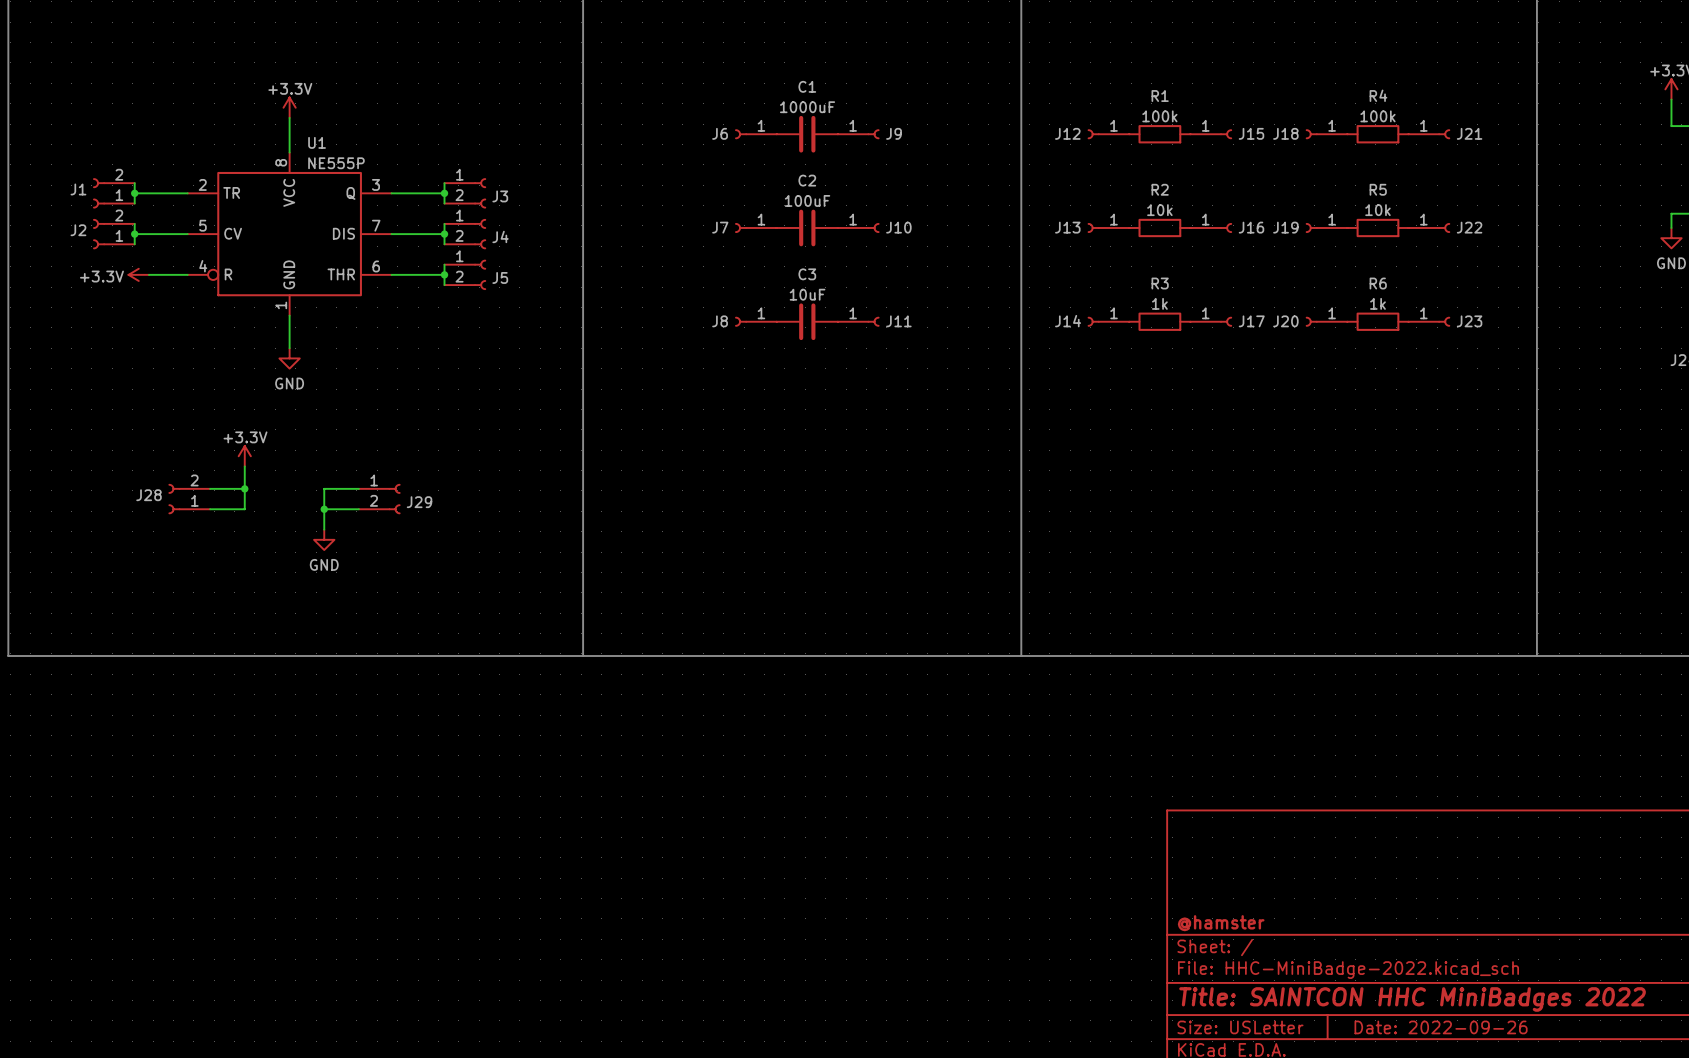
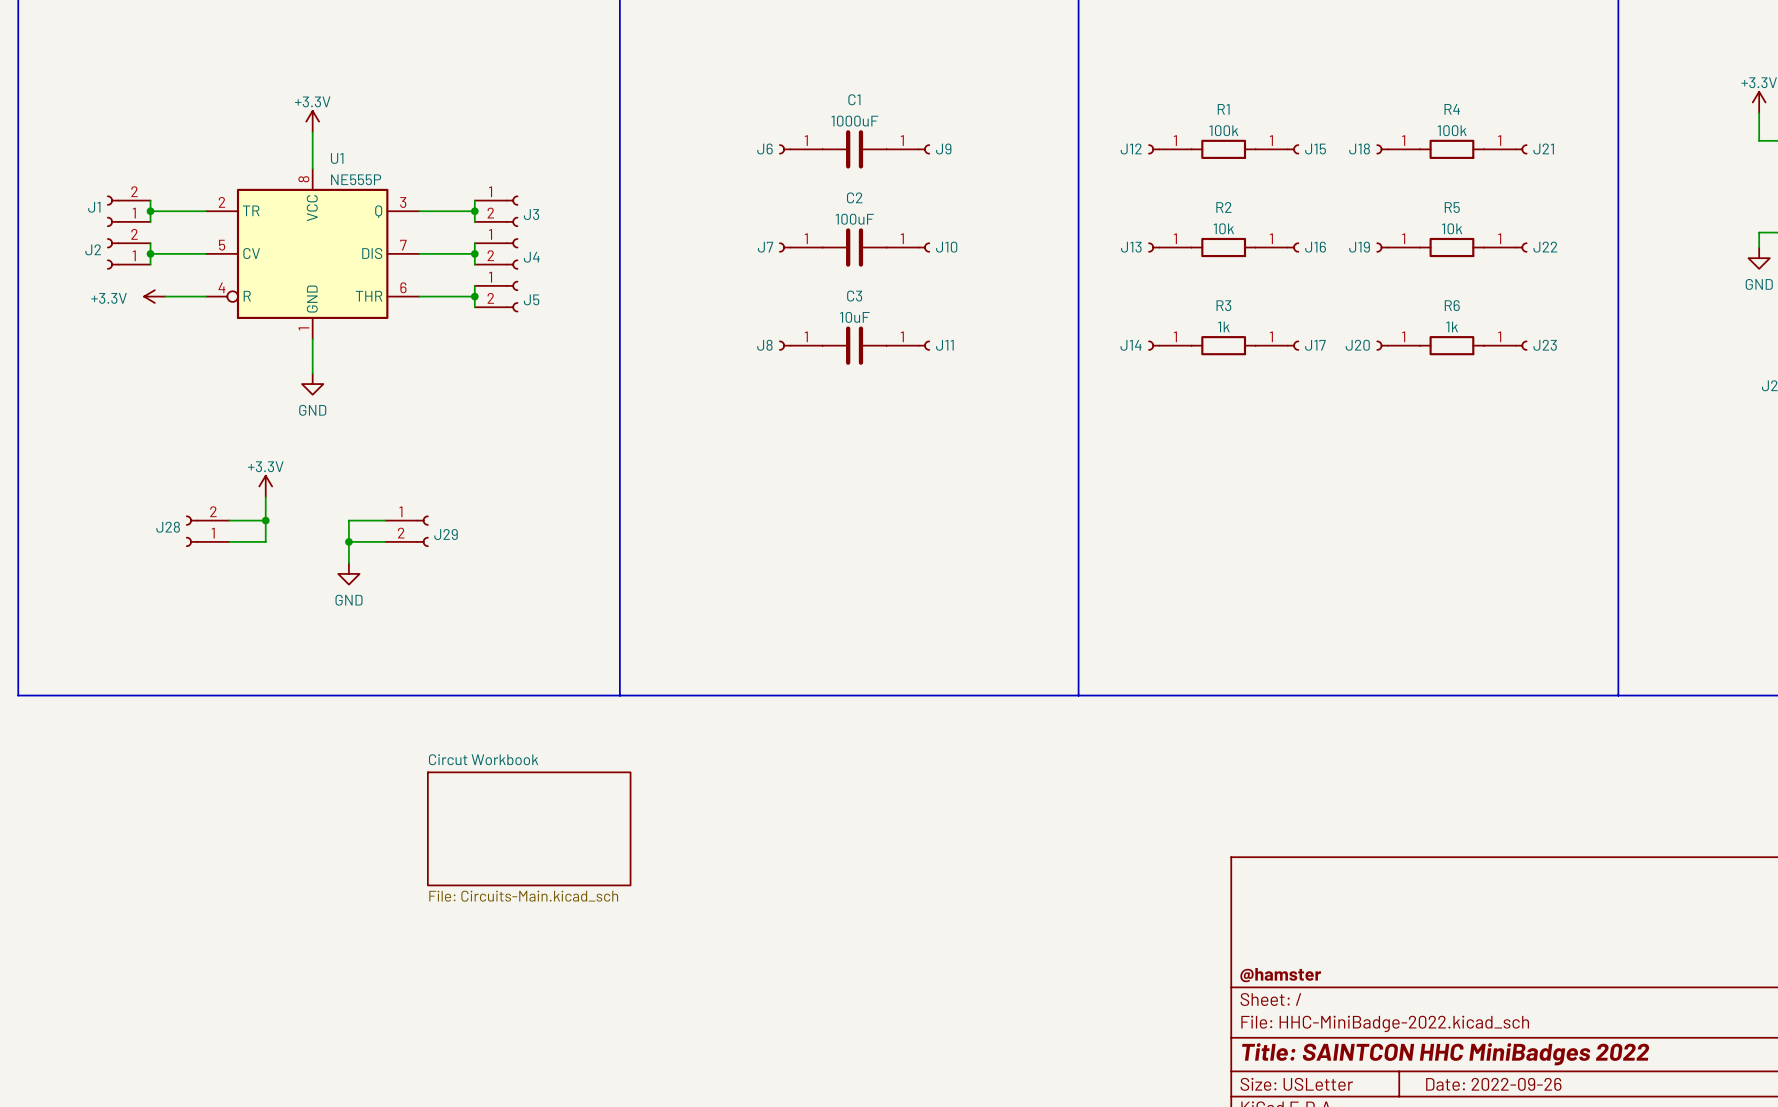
sheet Circut Workbook: none -> File: Circuits-Main.kicad_sch (529, 828)

